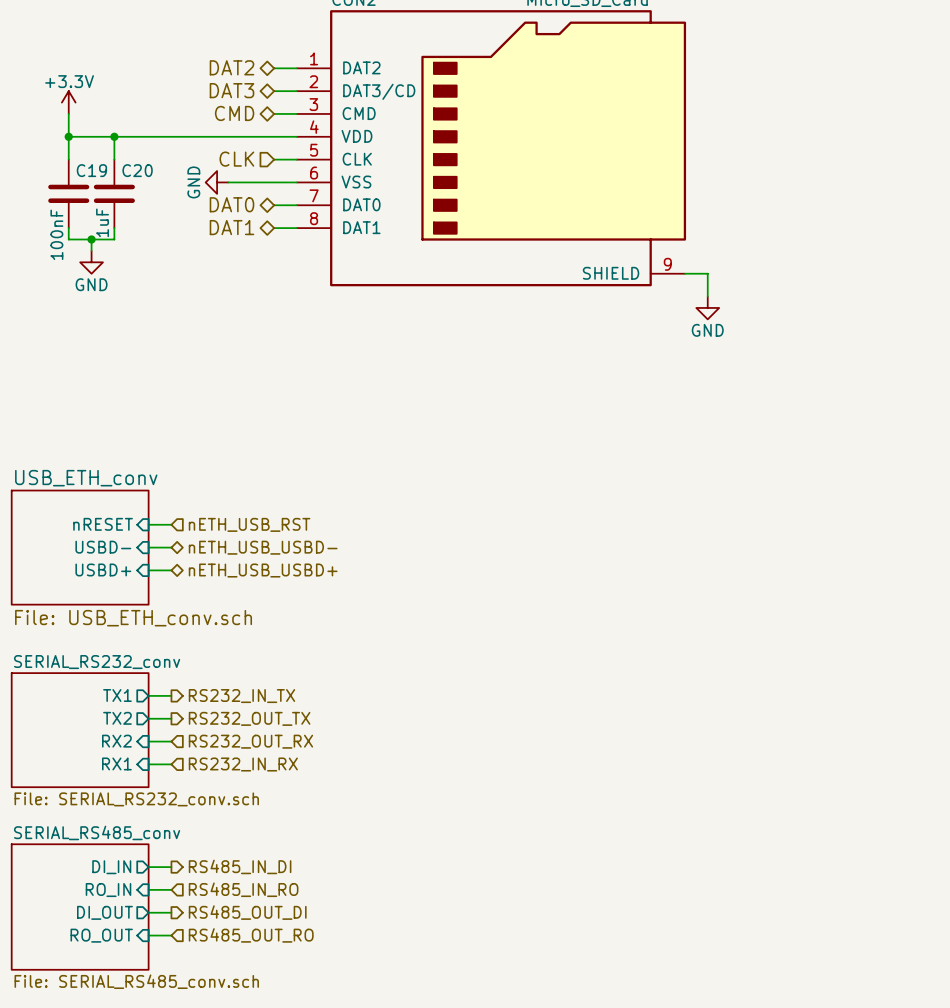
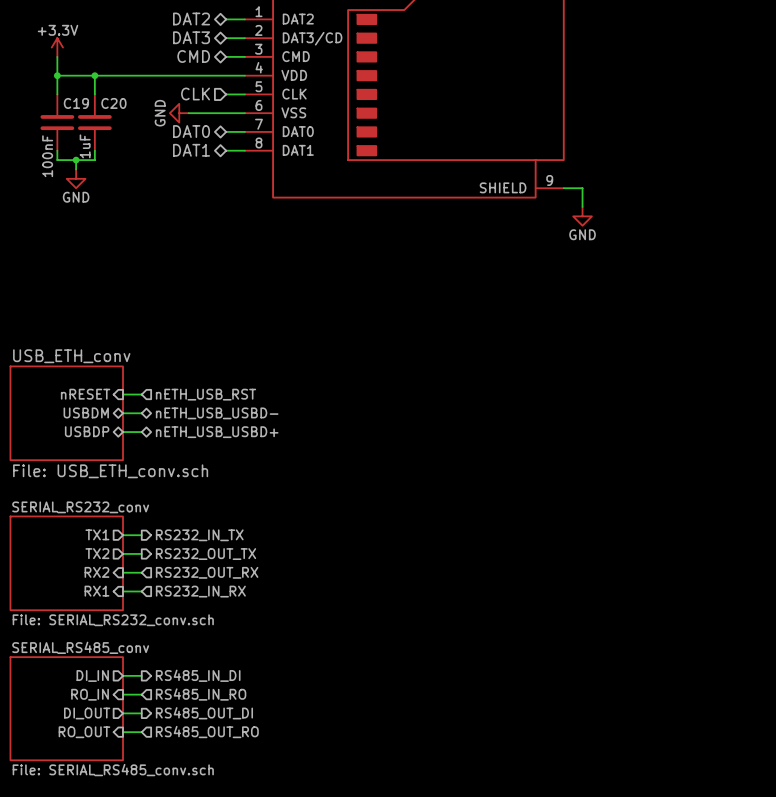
sheet pin shape: input (103, 547) -> bidirectional (86, 412)
sheet pin: USBD- (103, 547) -> USBDM (86, 412)
sheet pin shape: input (103, 569) -> bidirectional (87, 431)
sheet pin: USBD+ (103, 569) -> USBDP (87, 431)

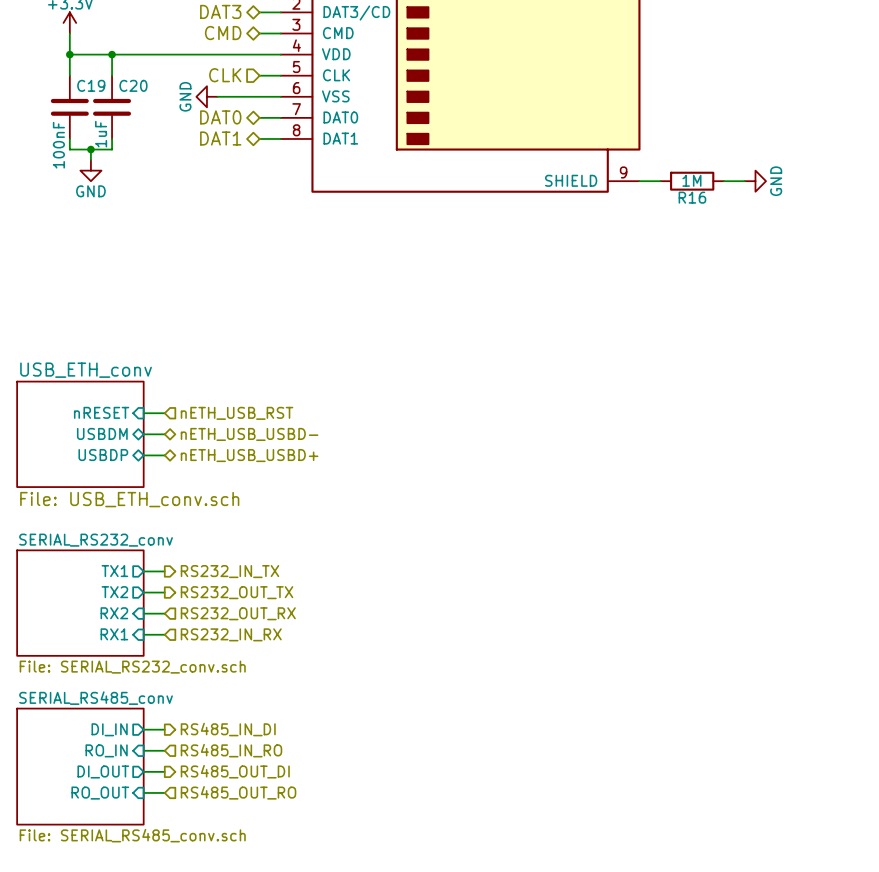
wire: (582, 188) (582, 206) -> none
R16: none -> 1M (692, 181)
wire: none -> (723, 181) (744, 181)
power symbol rotation: 0° (582, 216) -> 90° counterclockwise (755, 181)
power symbol position: GND (582, 216) -> GND (755, 181)

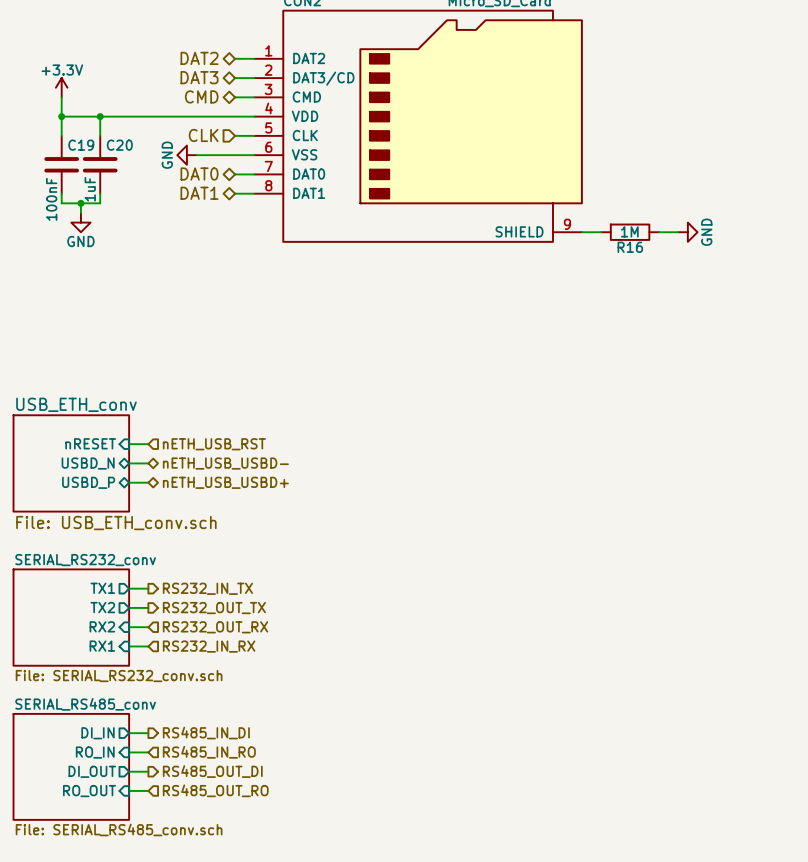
sheet pin: USBDM (102, 433) -> USBD_N (88, 463)
sheet pin: USBDP (103, 455) -> USBD_P (88, 482)

